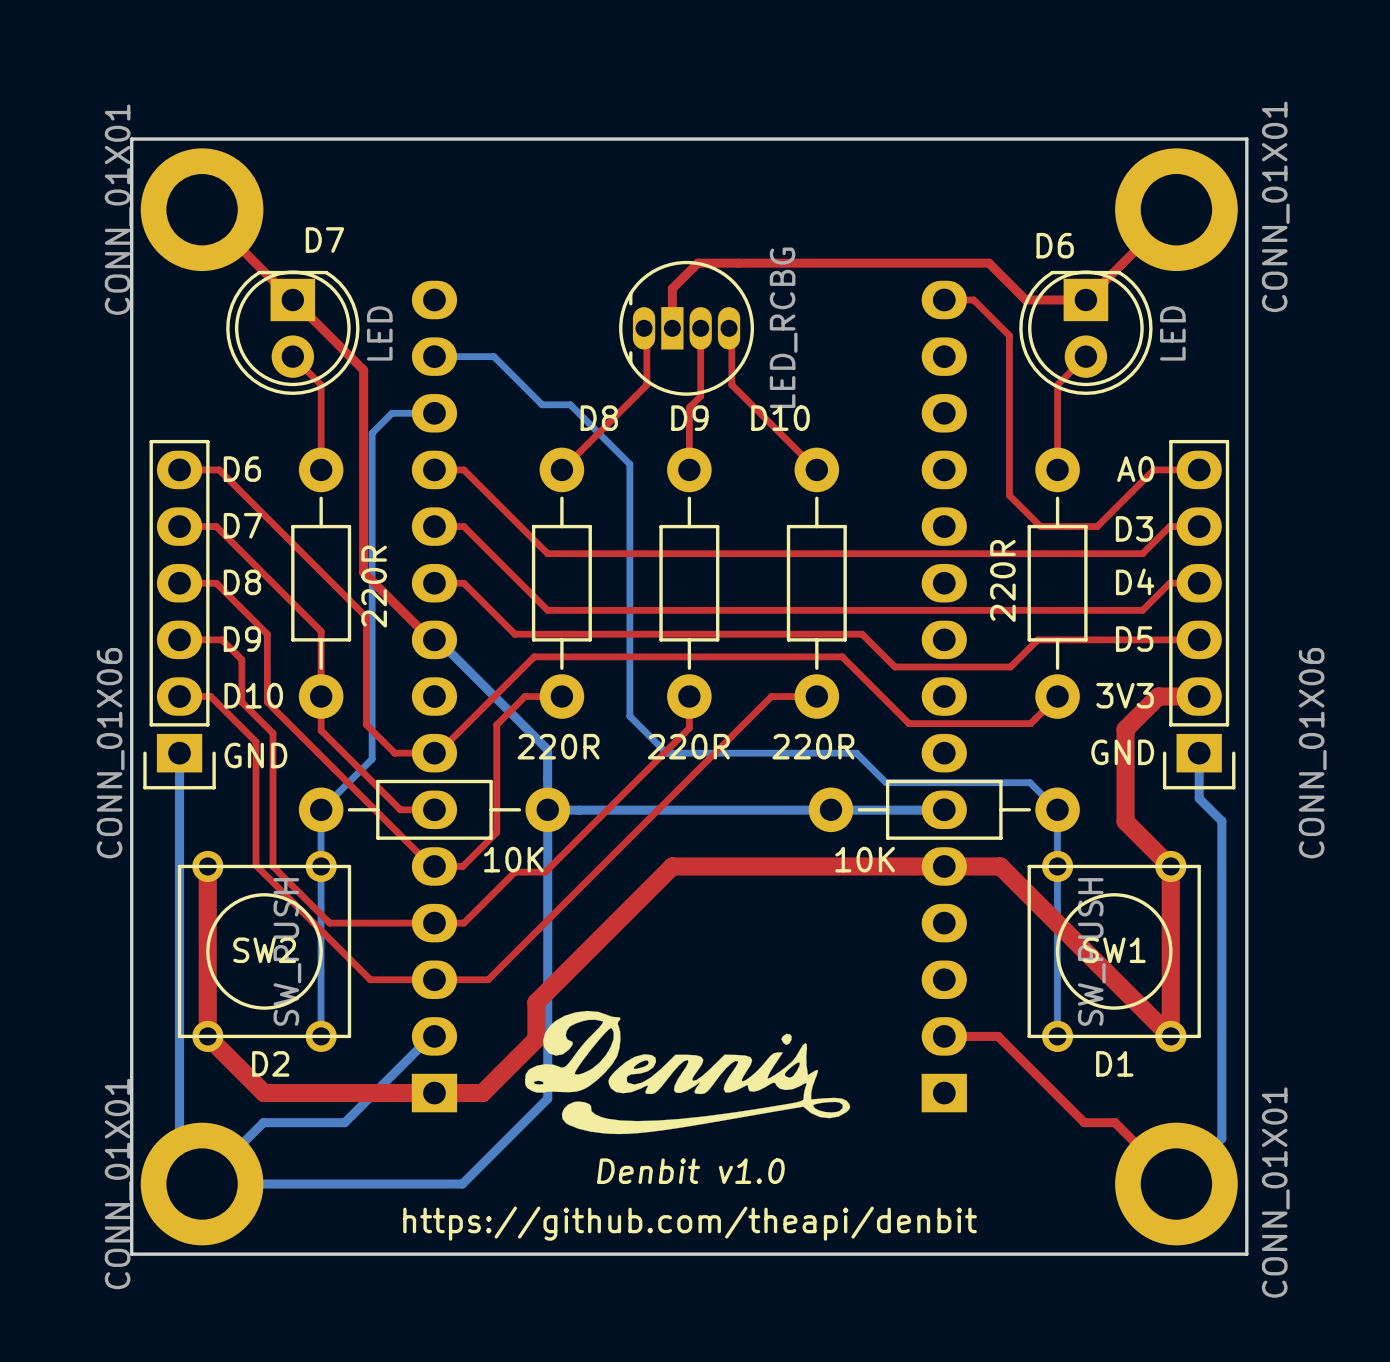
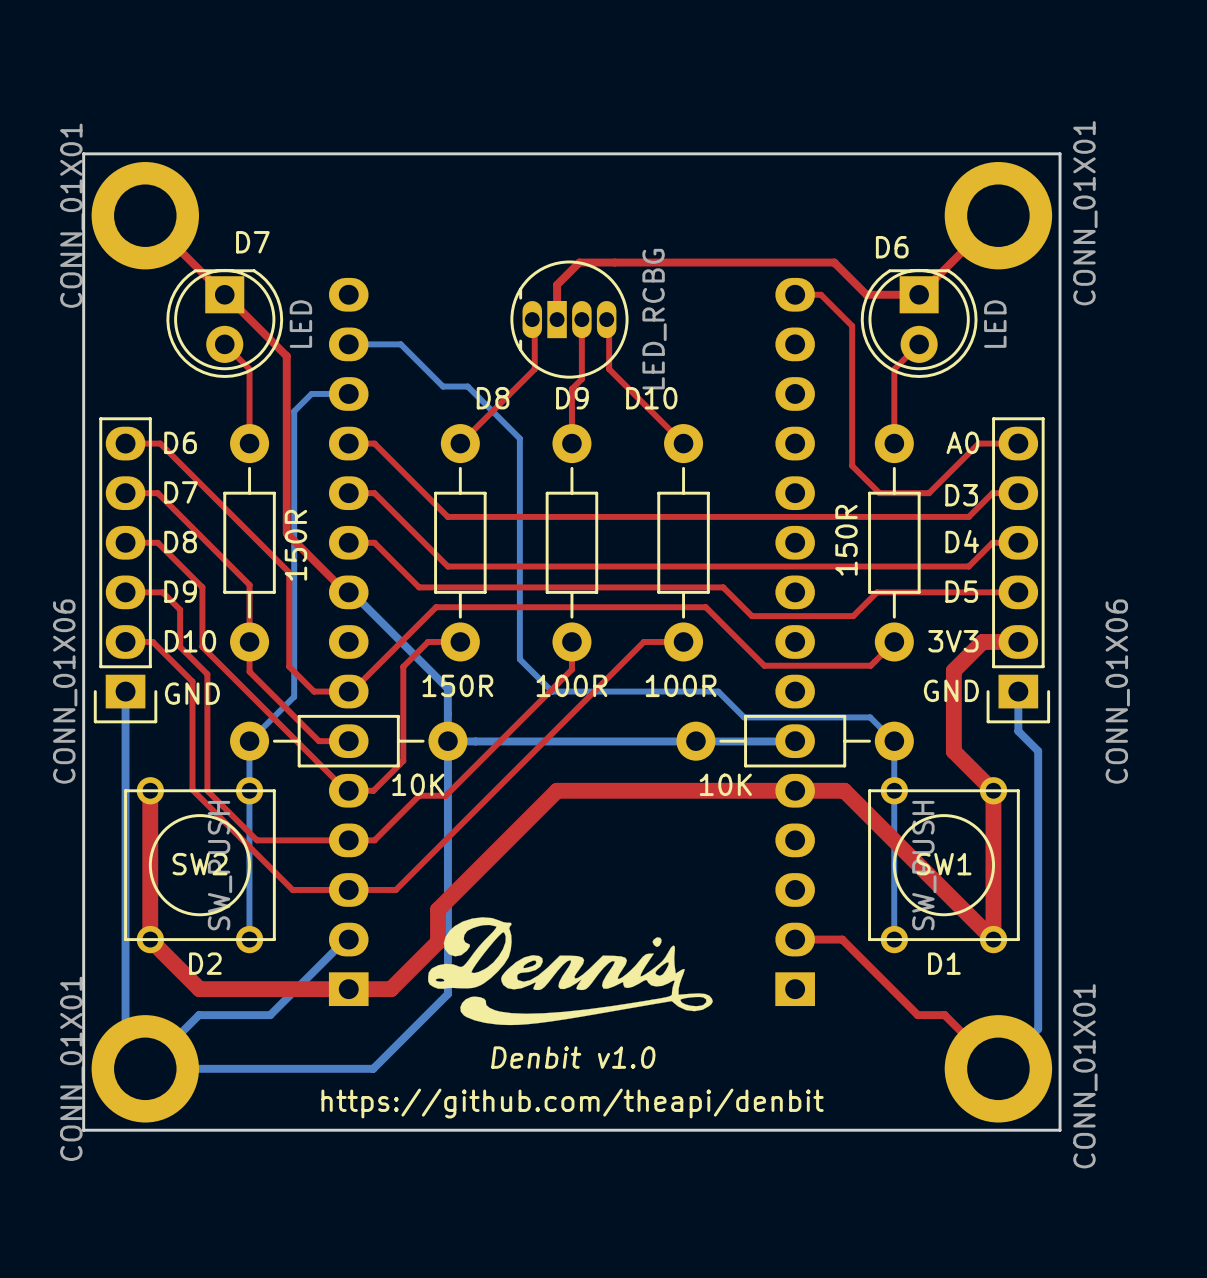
part value: 220R (1002, 580) -> 150R (846, 540)
part value: 220R (374, 586) -> 150R (295, 545)
part value: 220R (558, 746) -> 150R (457, 685)
part value: 220R (688, 746) -> 100R (571, 685)
part value: 220R (813, 746) -> 100R (681, 685)

